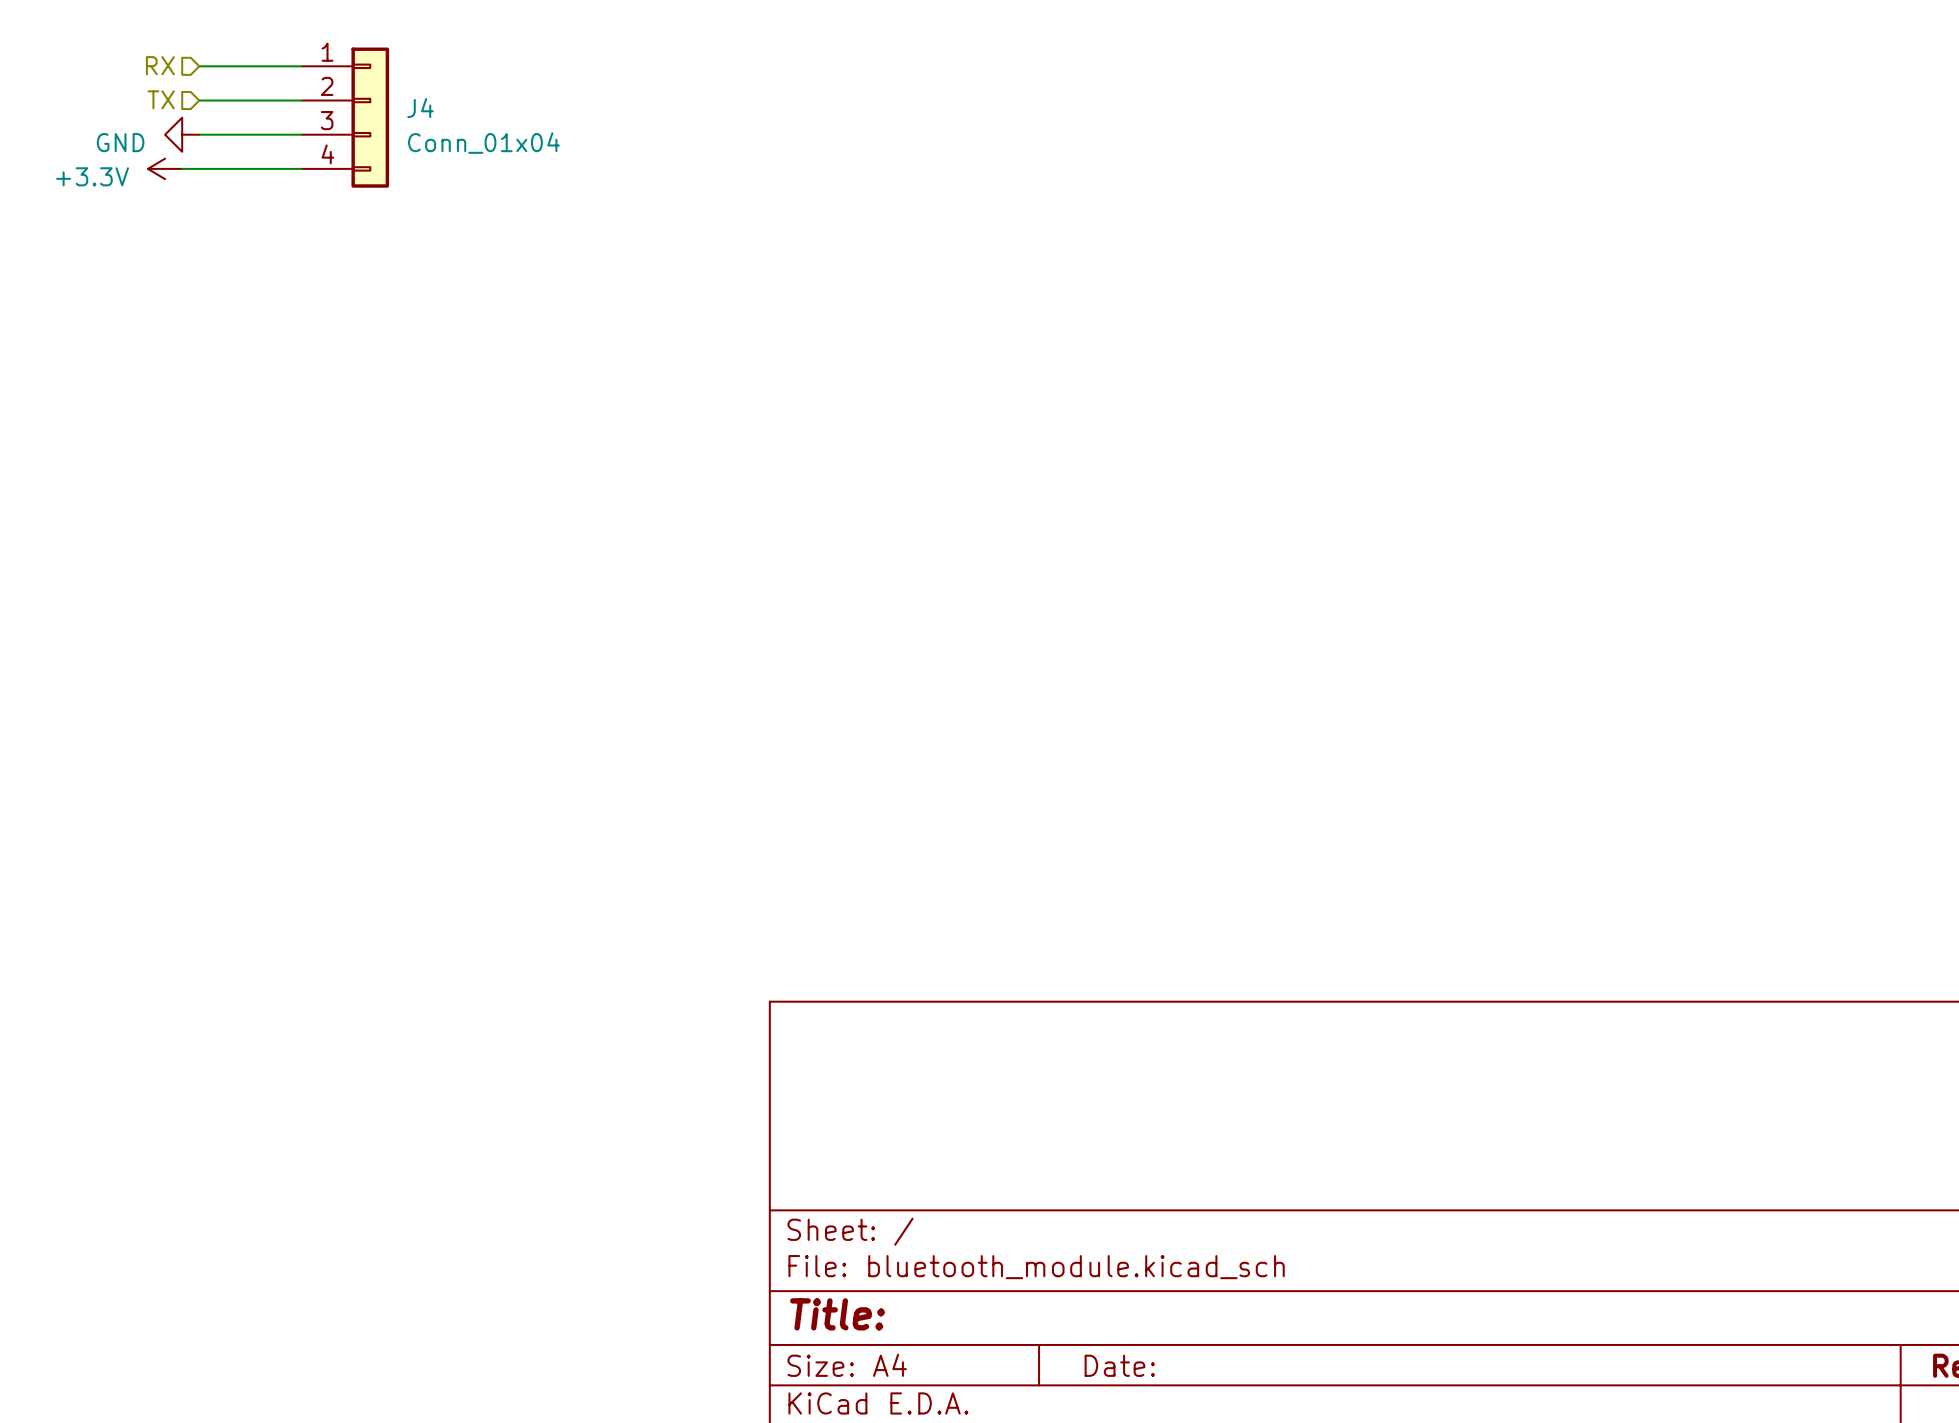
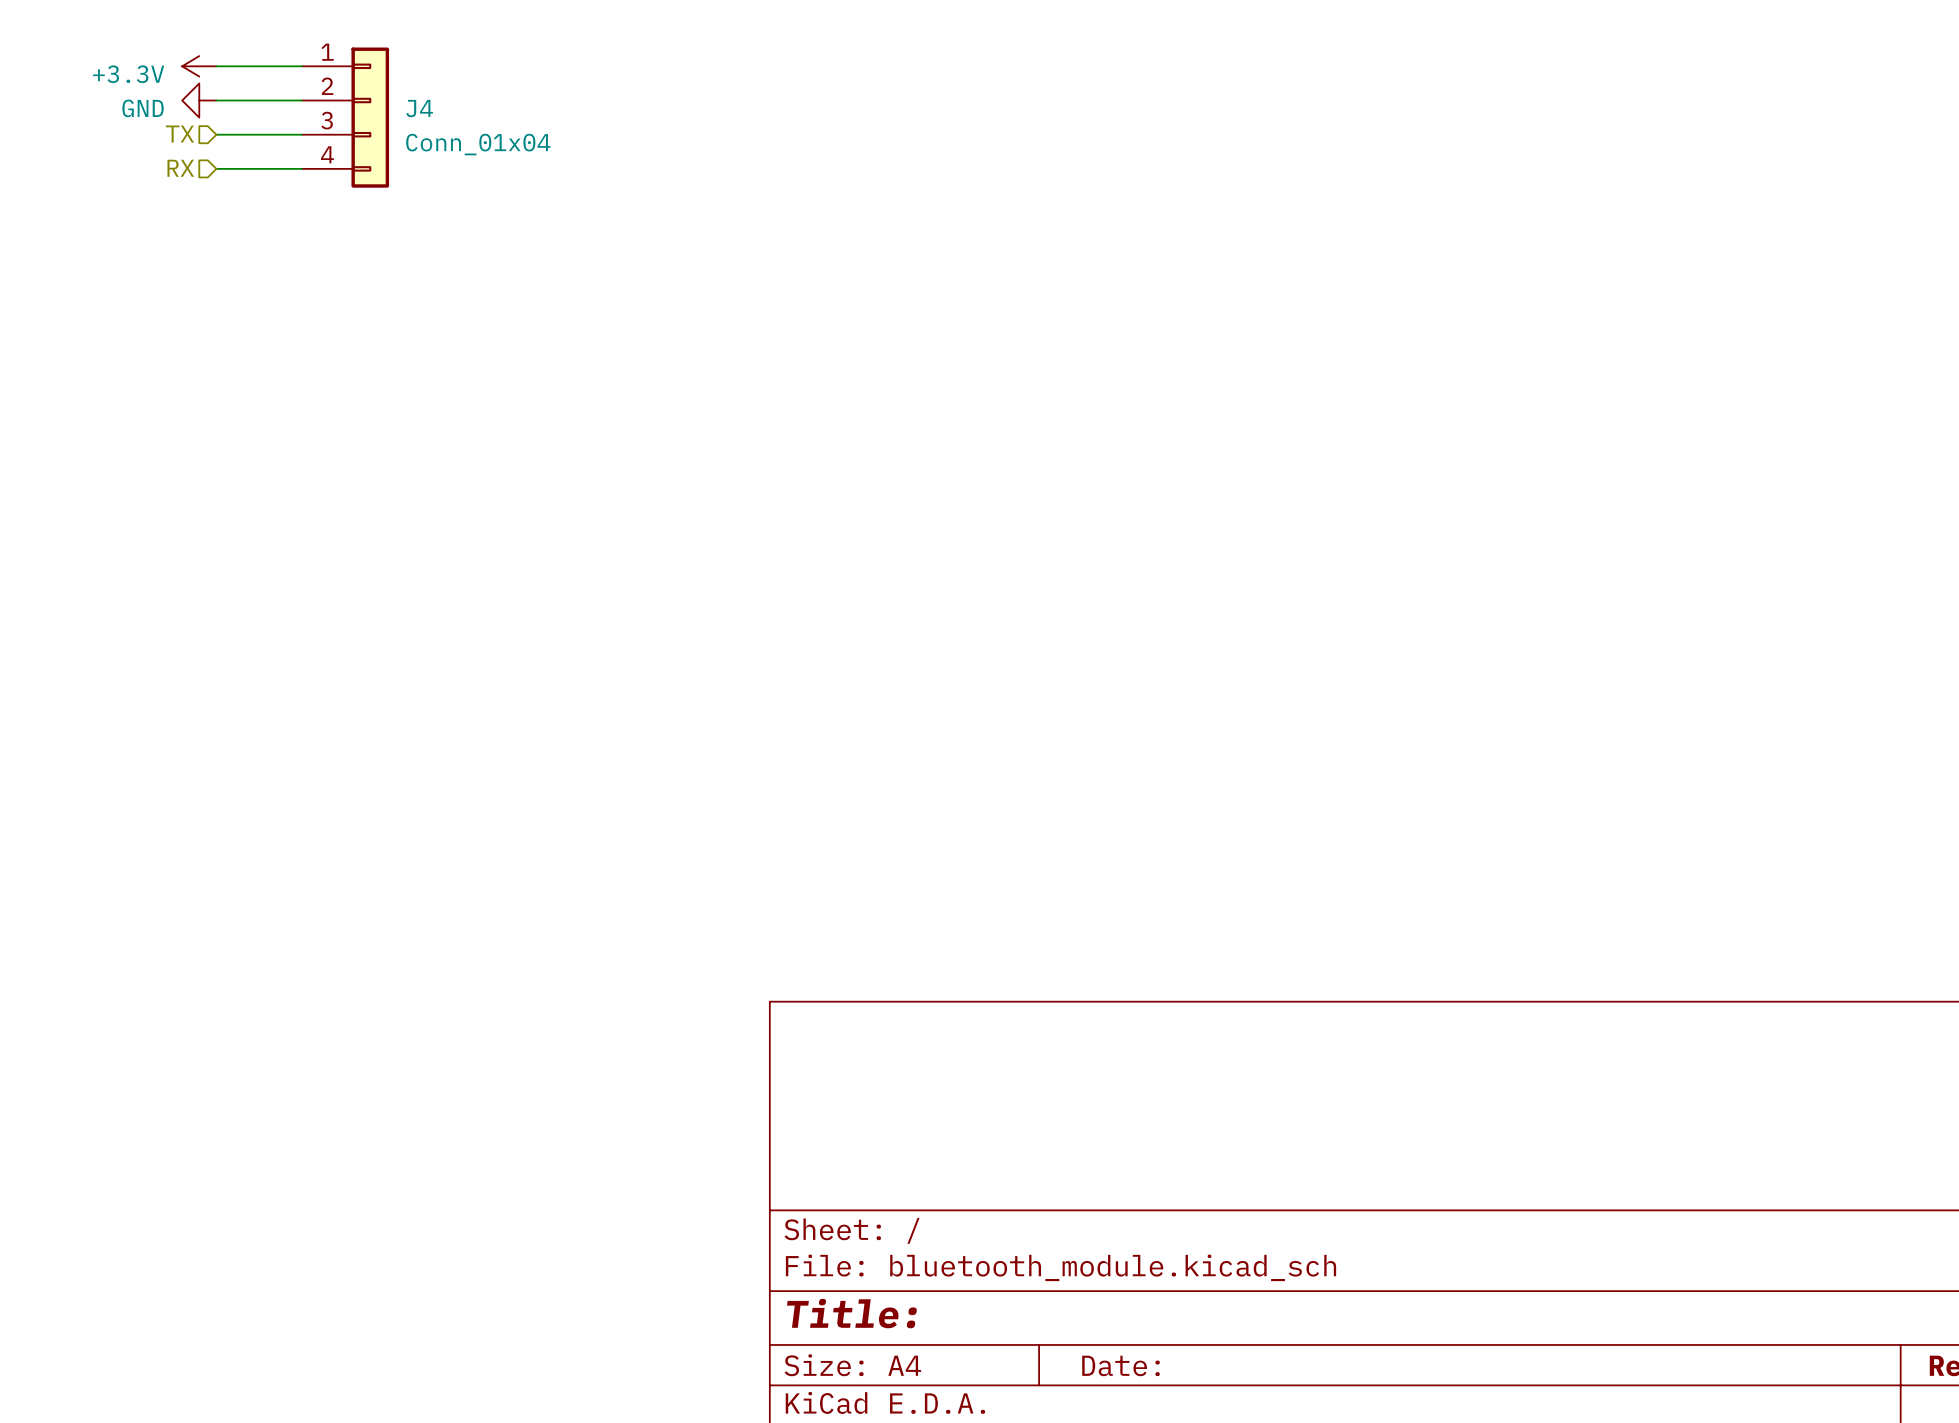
hierarchical label position: RX (160, 65) -> RX (180, 168)
hierarchical label position: TX (161, 99) -> TX (179, 134)
power symbol position: GND (182, 134) -> GND (199, 100)
wire: (199, 134) (216, 134) -> none
power symbol position: +3.3V (165, 168) -> +3.3V (199, 66)
wire: (182, 168) (216, 168) -> none

